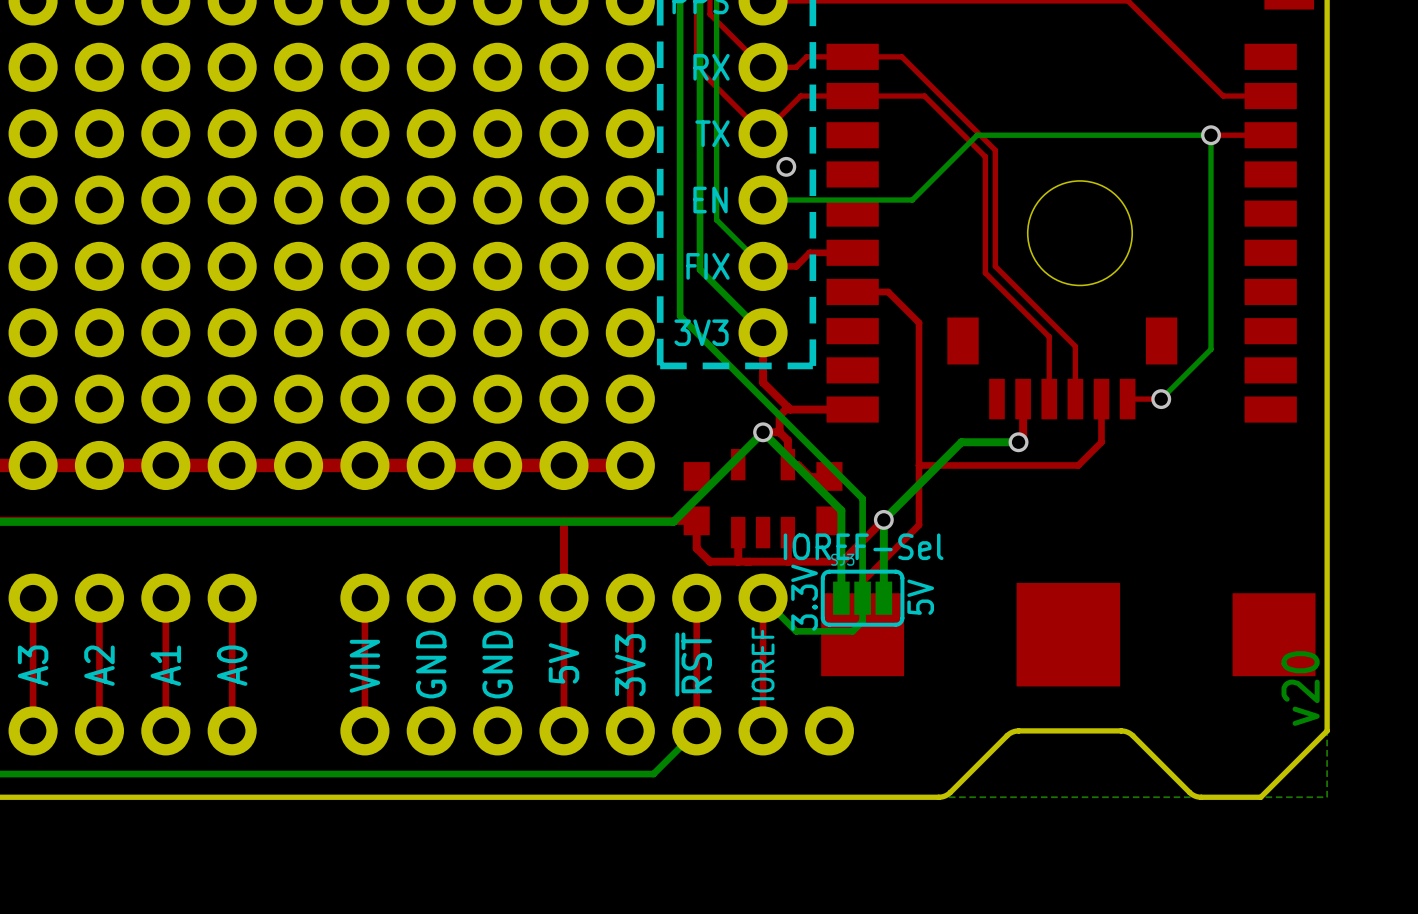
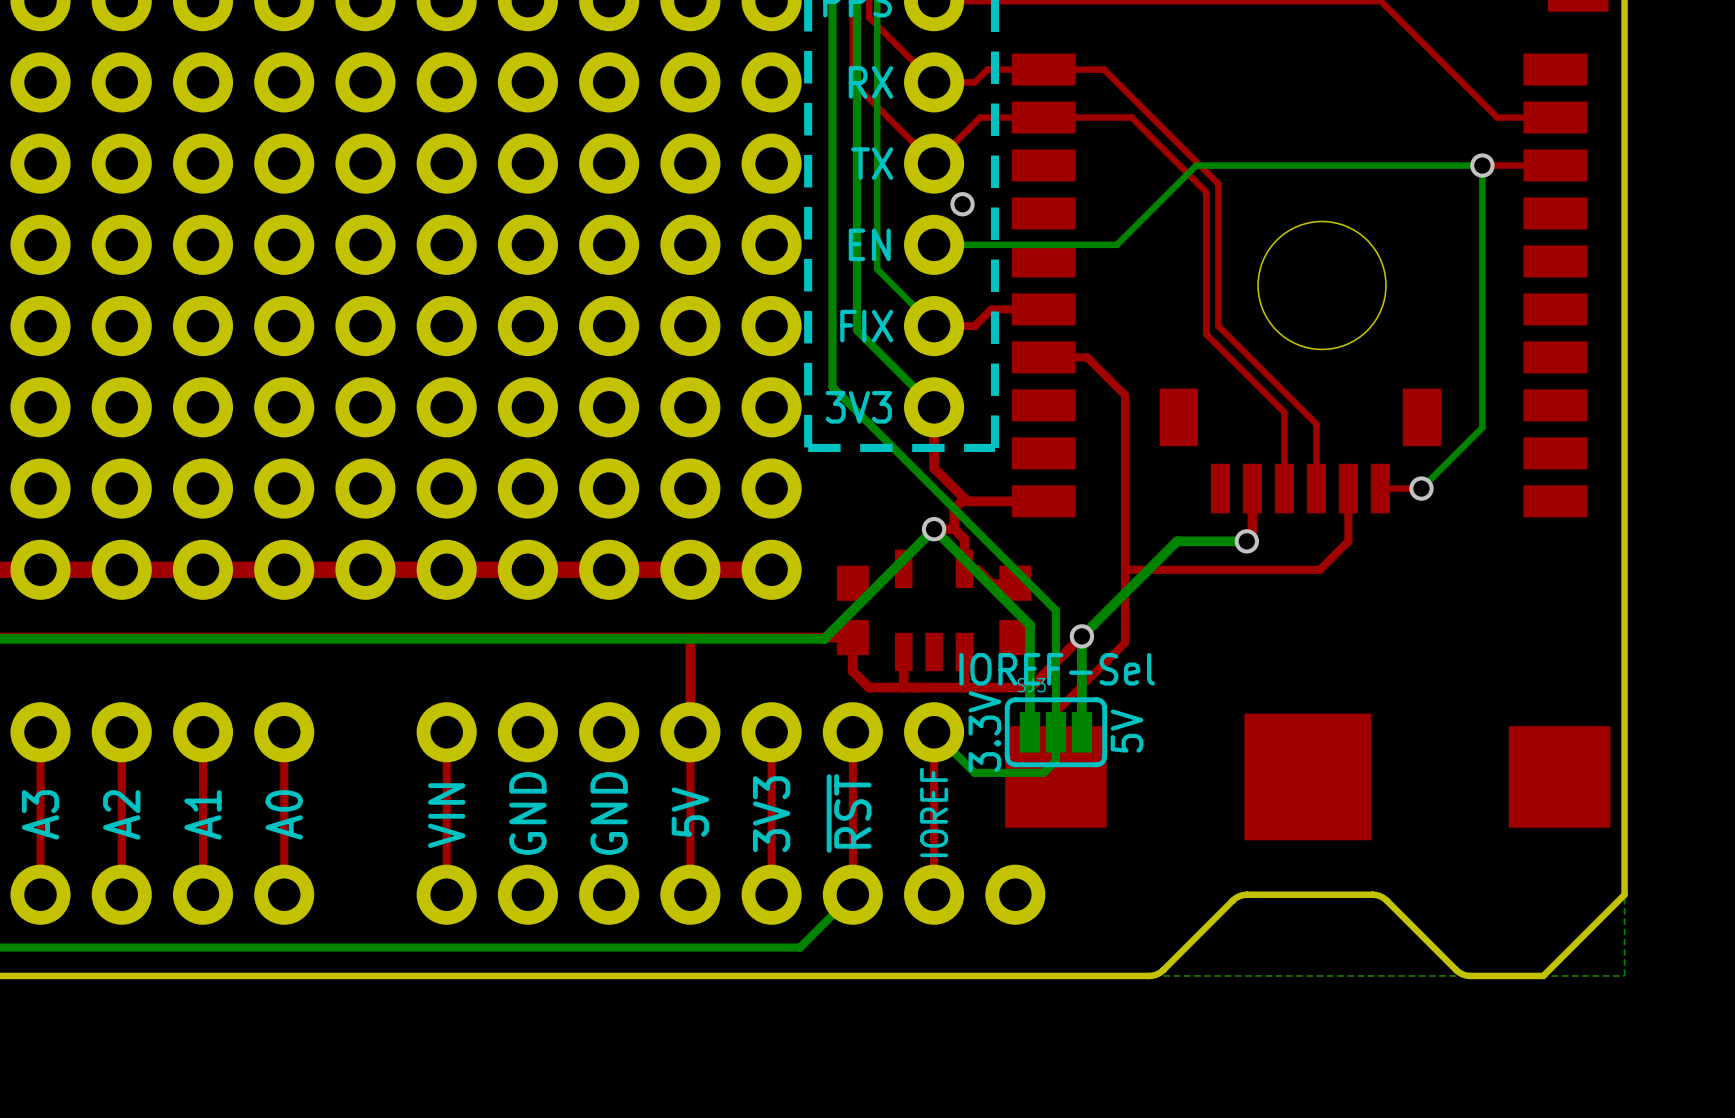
text: v20 (1300, 688) -> none

